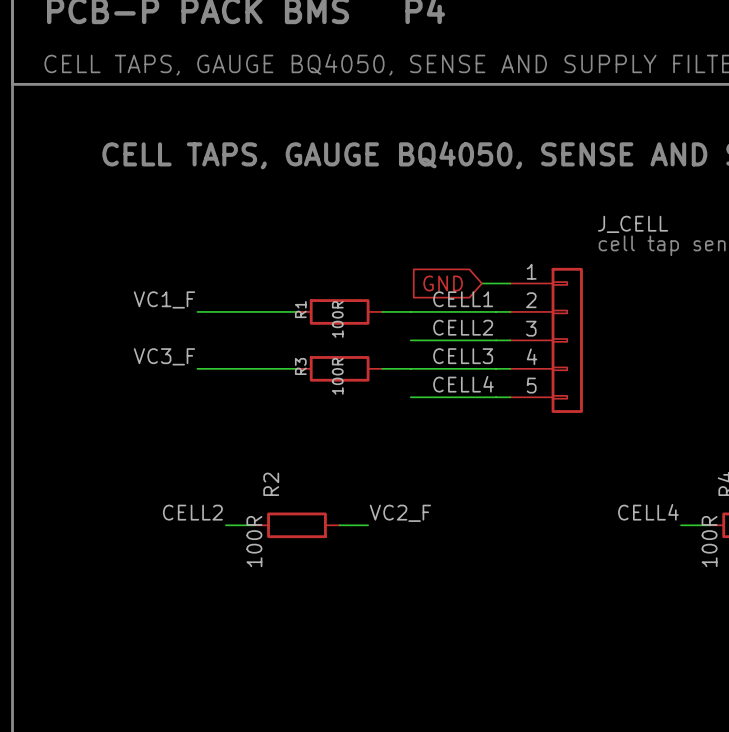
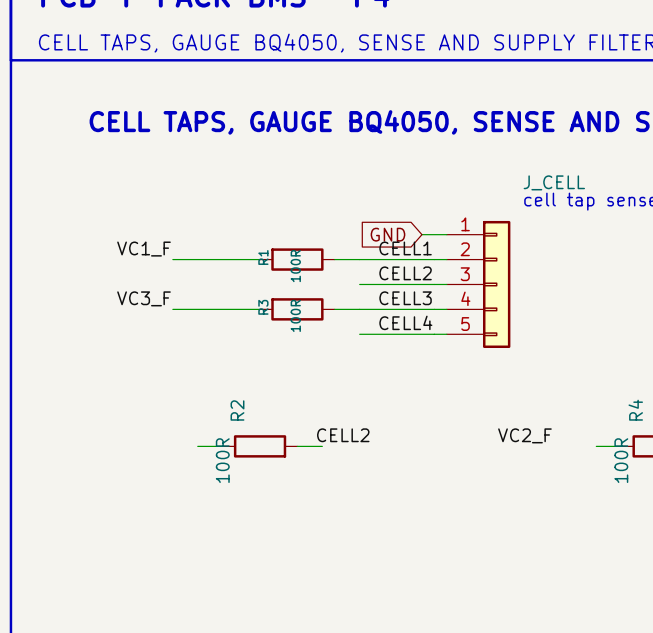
label position: CELL2 (192, 512) -> CELL2 (343, 435)
label: CELL4 (648, 512) -> none
label position: VC2_F (400, 513) -> VC2_F (524, 435)

